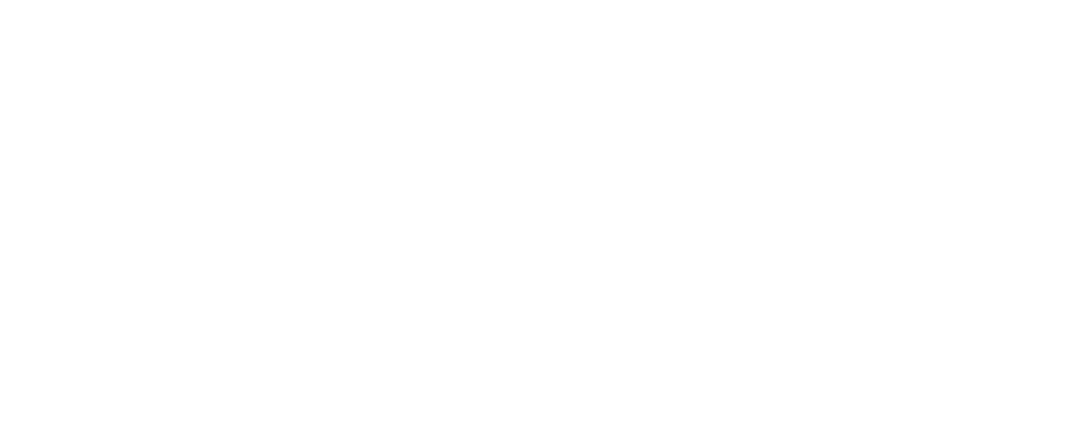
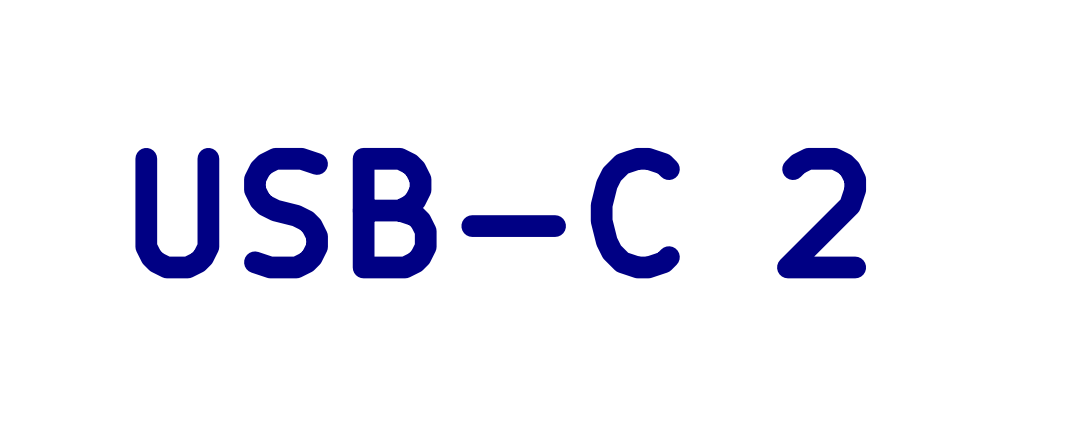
text: none -> USB-C 2 (500, 213)

